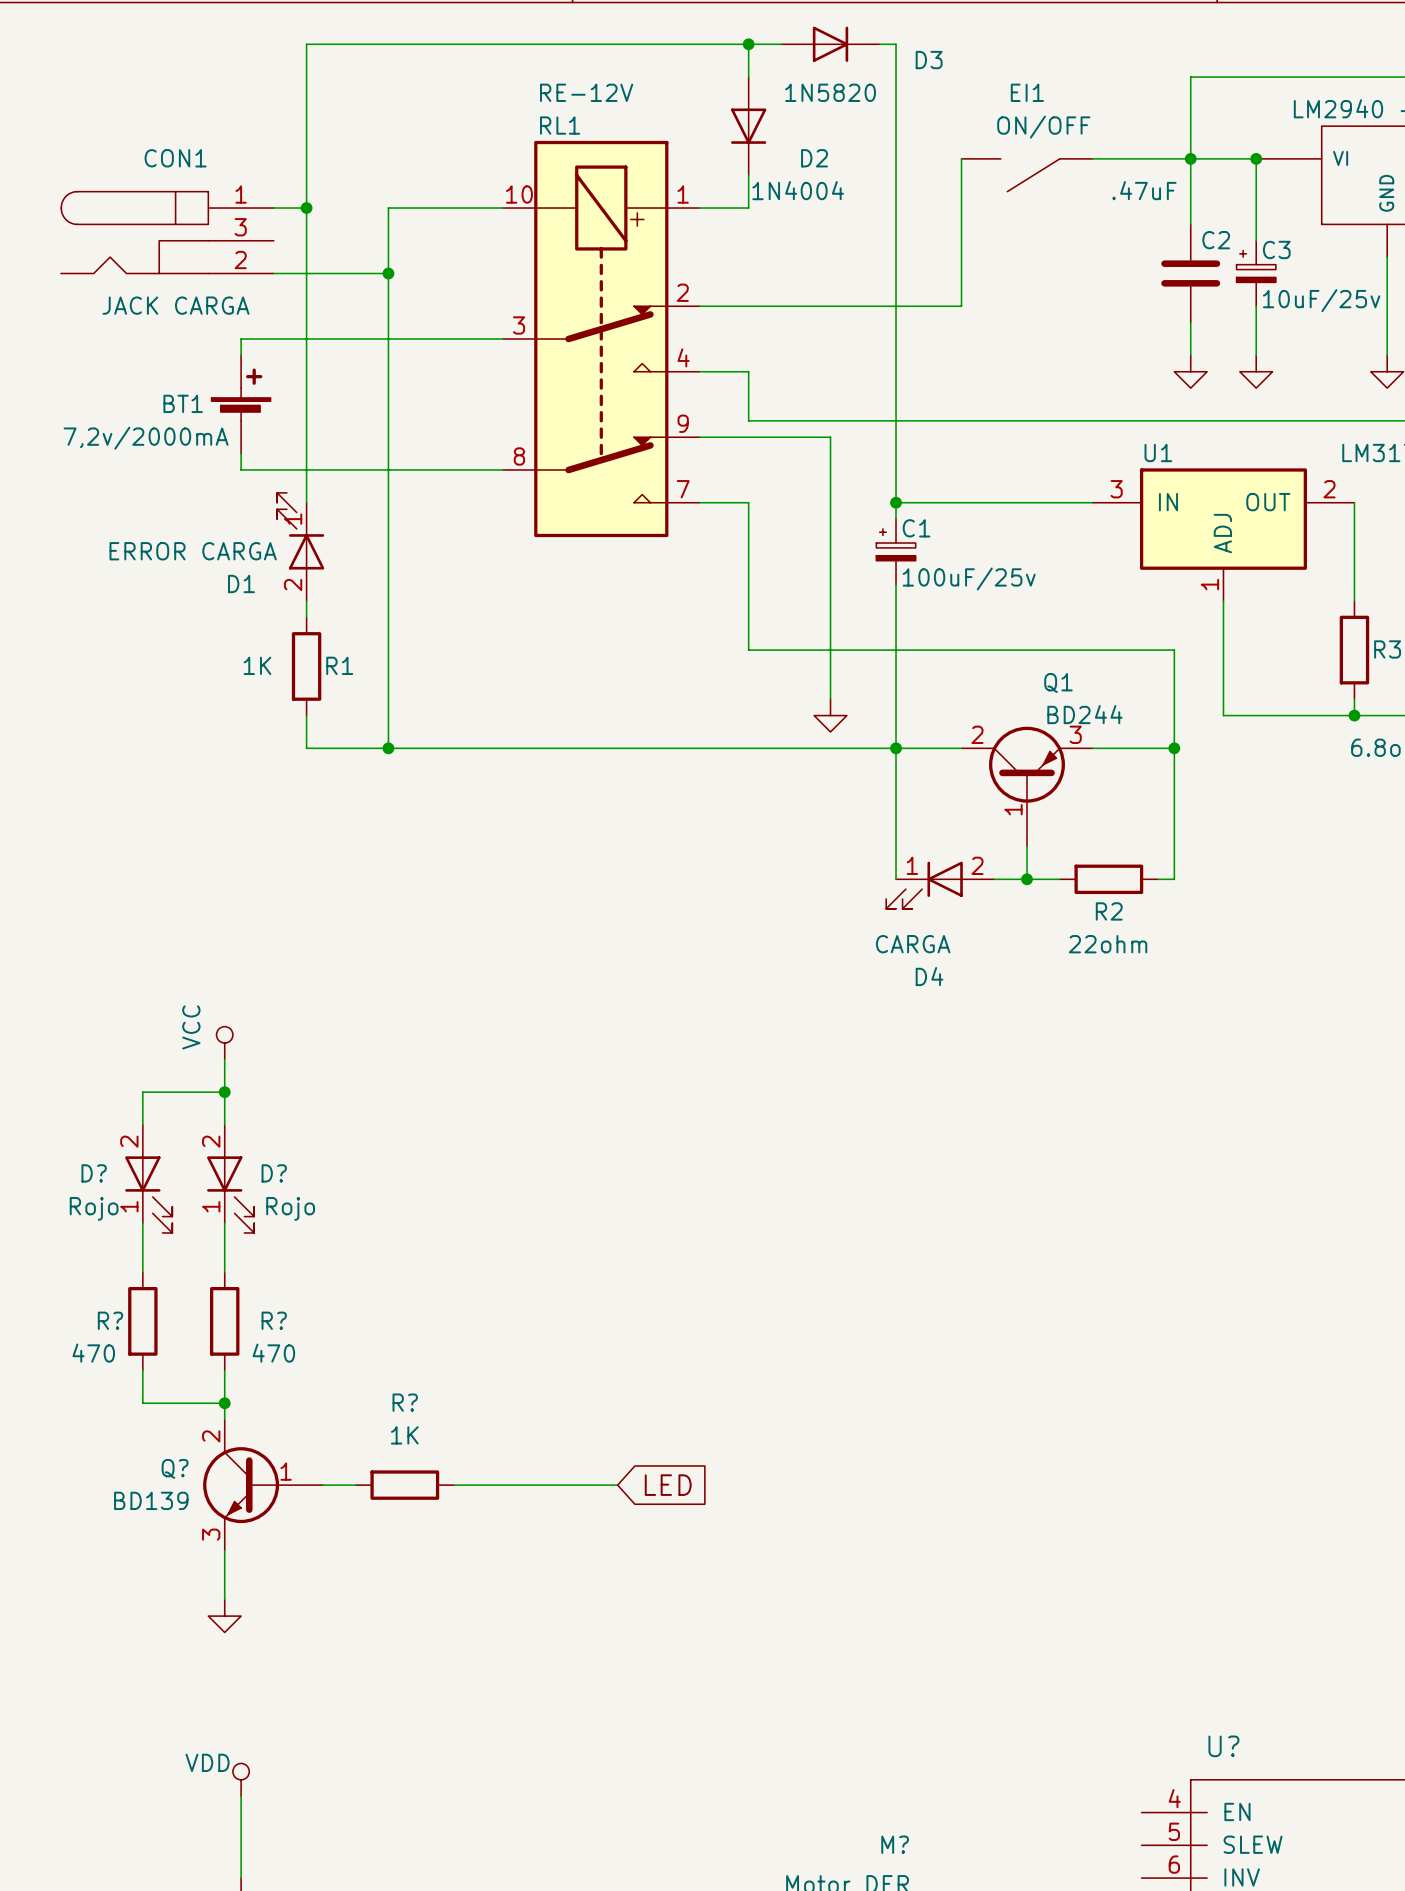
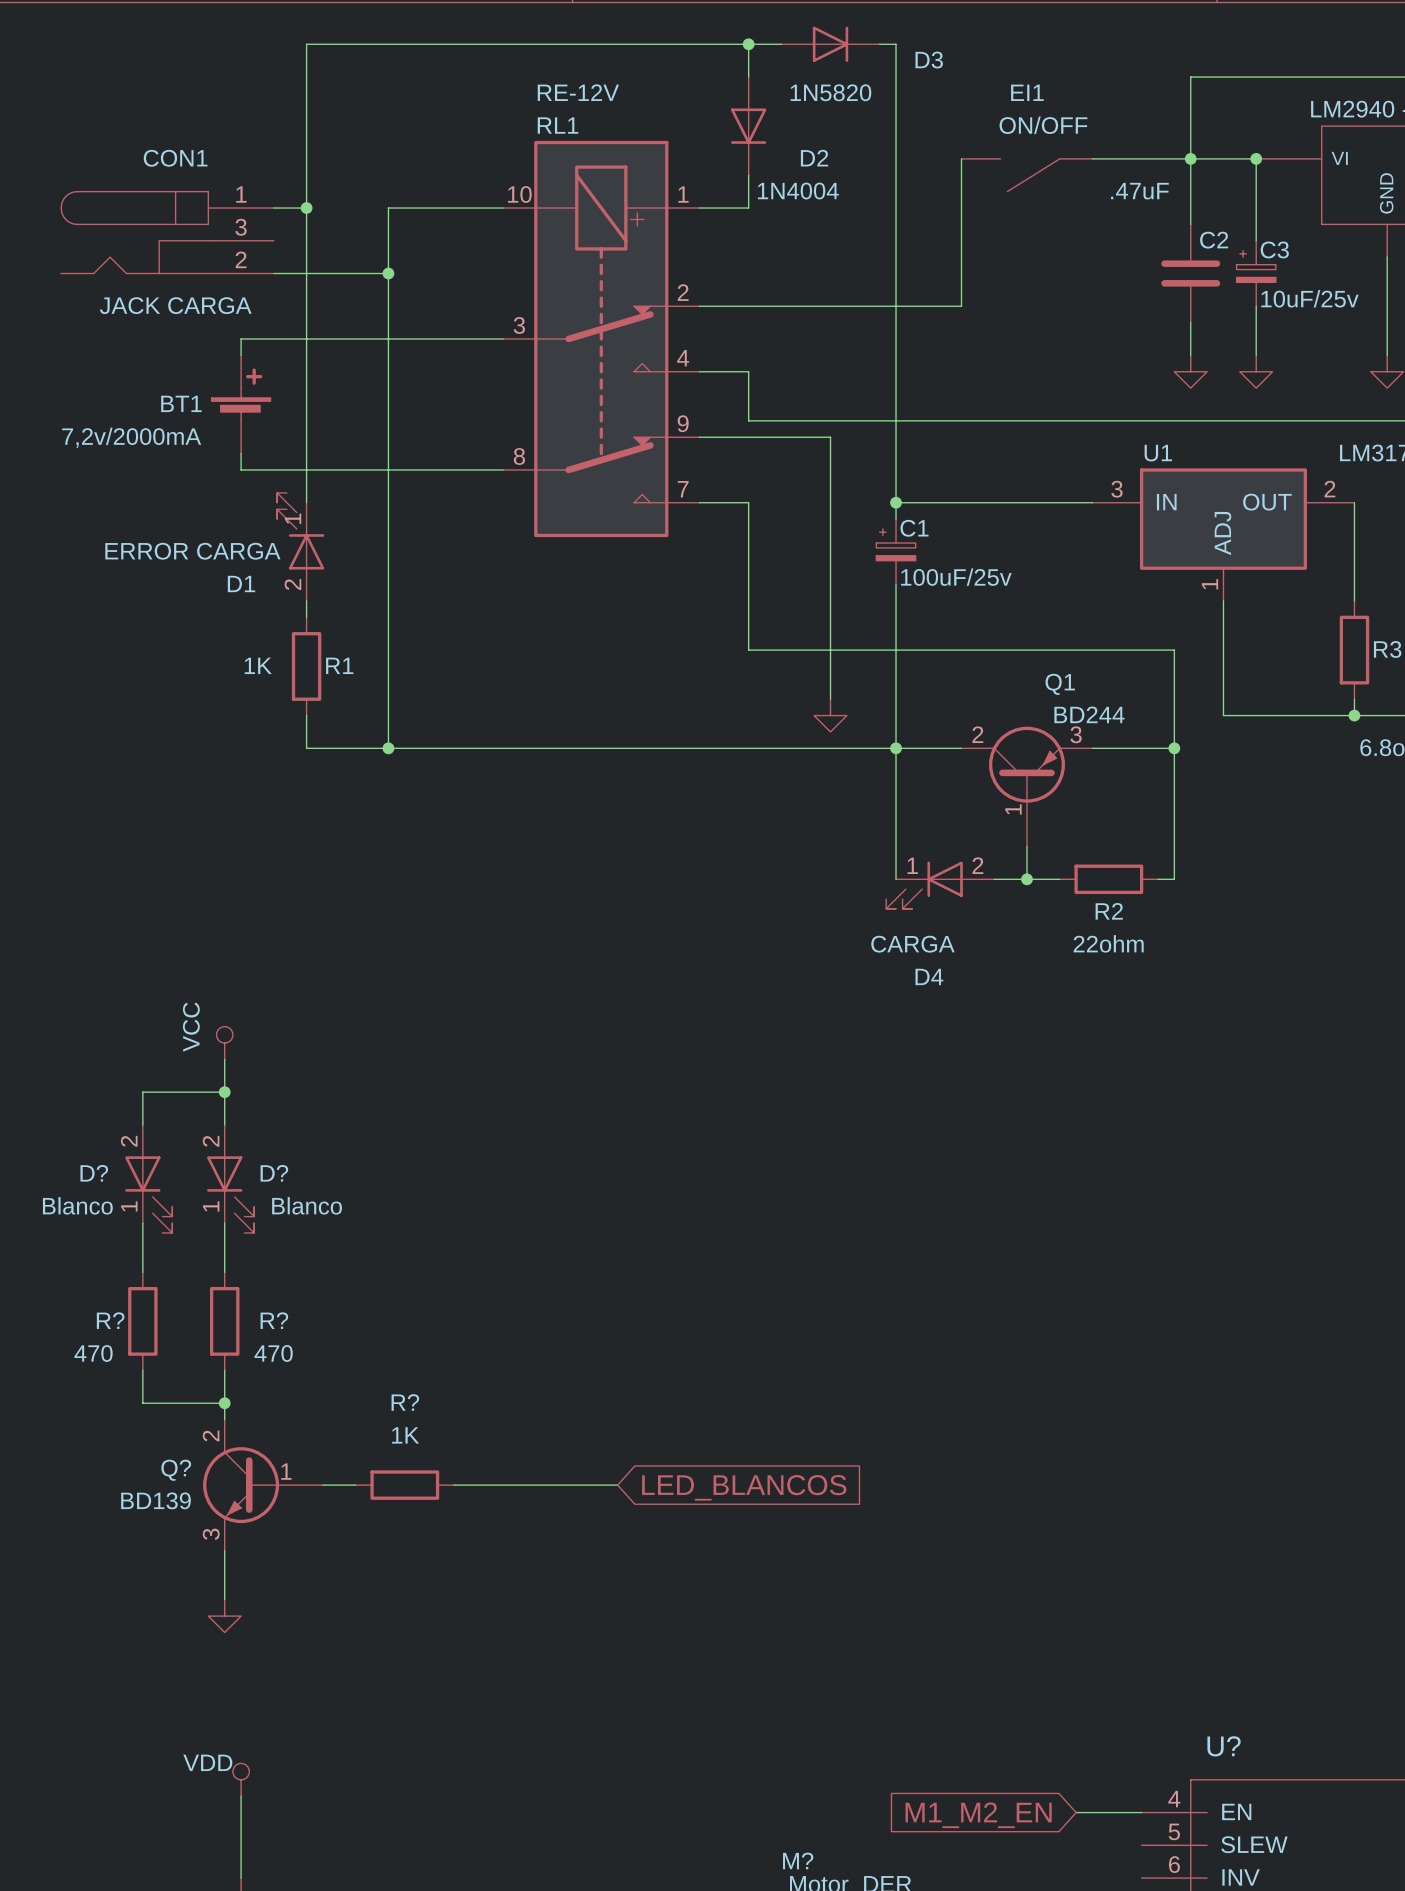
D? value: Rojo (94, 1208) -> Blanco (77, 1205)
D? value: Rojo (290, 1208) -> Blanco (307, 1205)
global label: LED (668, 1485) -> LED_BLANCOS (744, 1487)
wire: none -> (1076, 1812) (1141, 1812)
global label: none -> M1_M2_EN (978, 1815)
M? name position: M? (895, 1844) -> M? (798, 1860)

